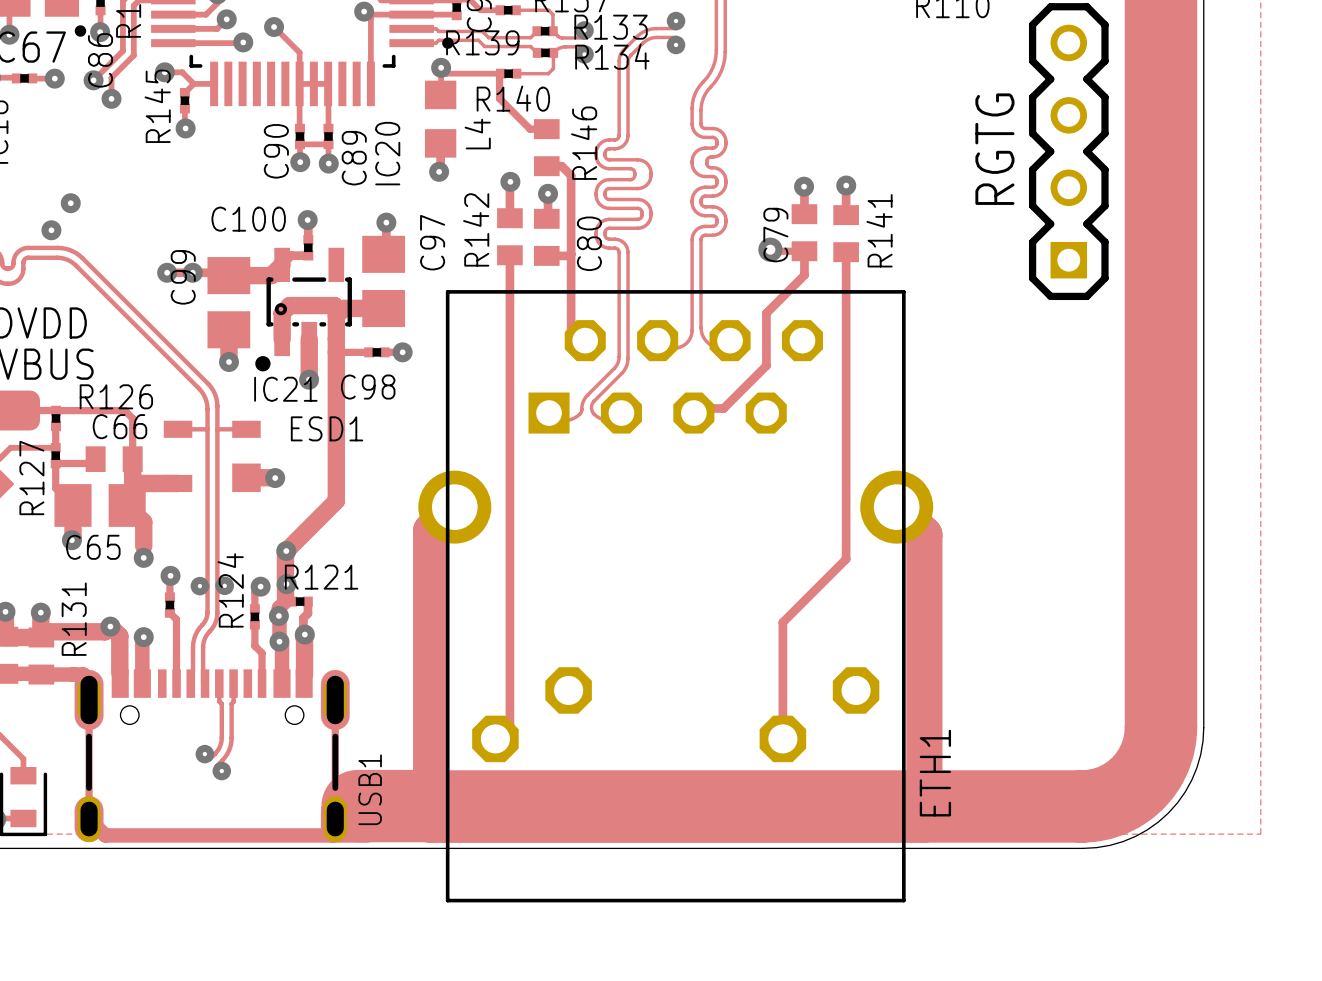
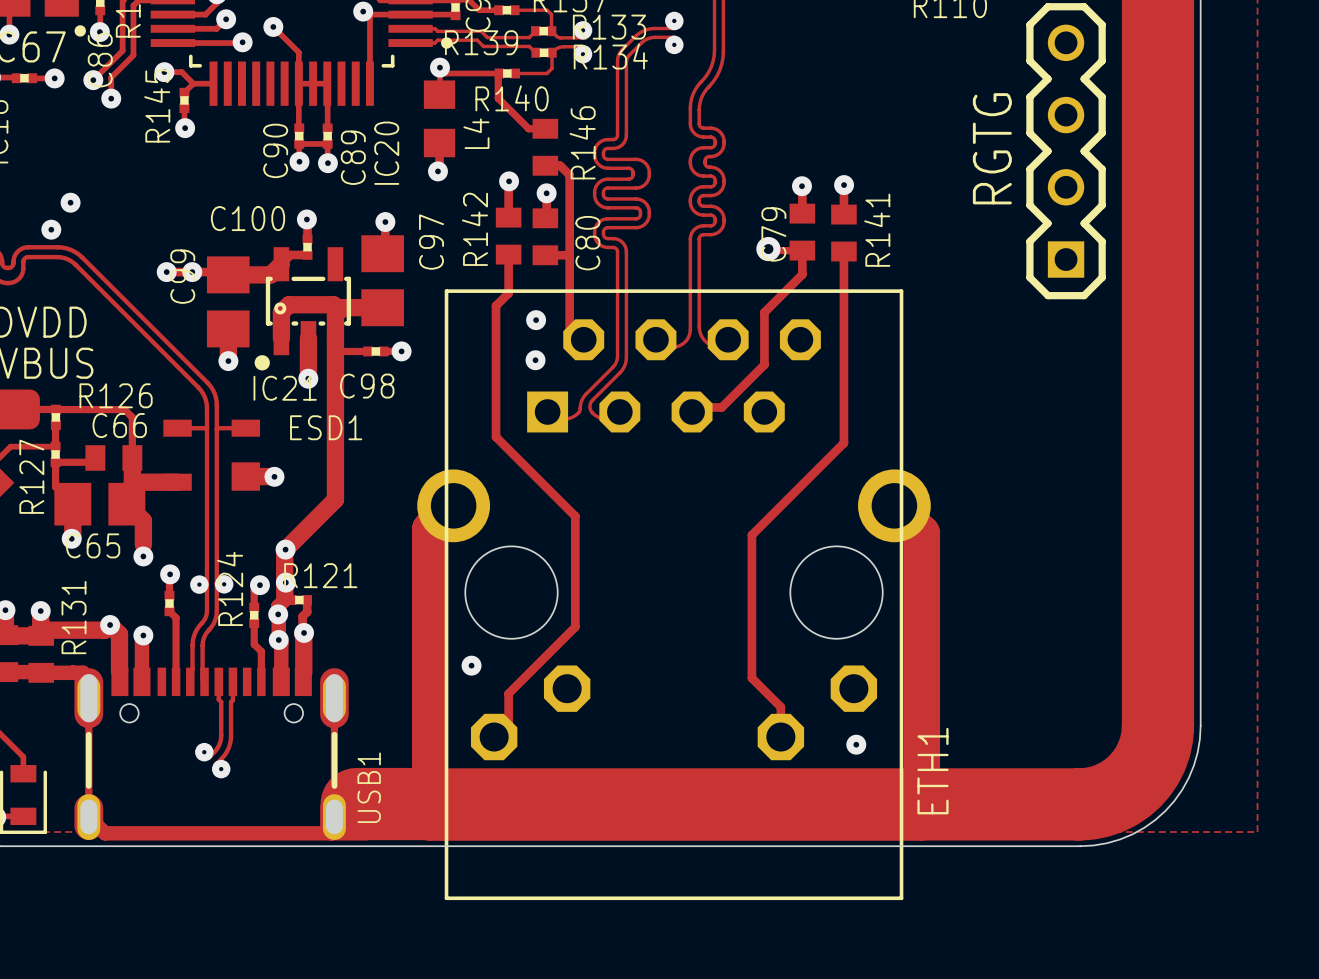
ETH1 footprint: [418, 290, 934, 903] -> [417, 289, 931, 901]
track: (509, 294) (509, 695) -> (508, 293) (496, 305) (496, 437) (575, 516) (575, 626) (508, 693)
via: none -> (536, 320)
via: none -> (535, 360)
track: (846, 444) (846, 559) (782, 622) (782, 708) -> (843, 443) (751, 535) (751, 678) (780, 707)
via: none -> (471, 665)
via: none -> (856, 744)

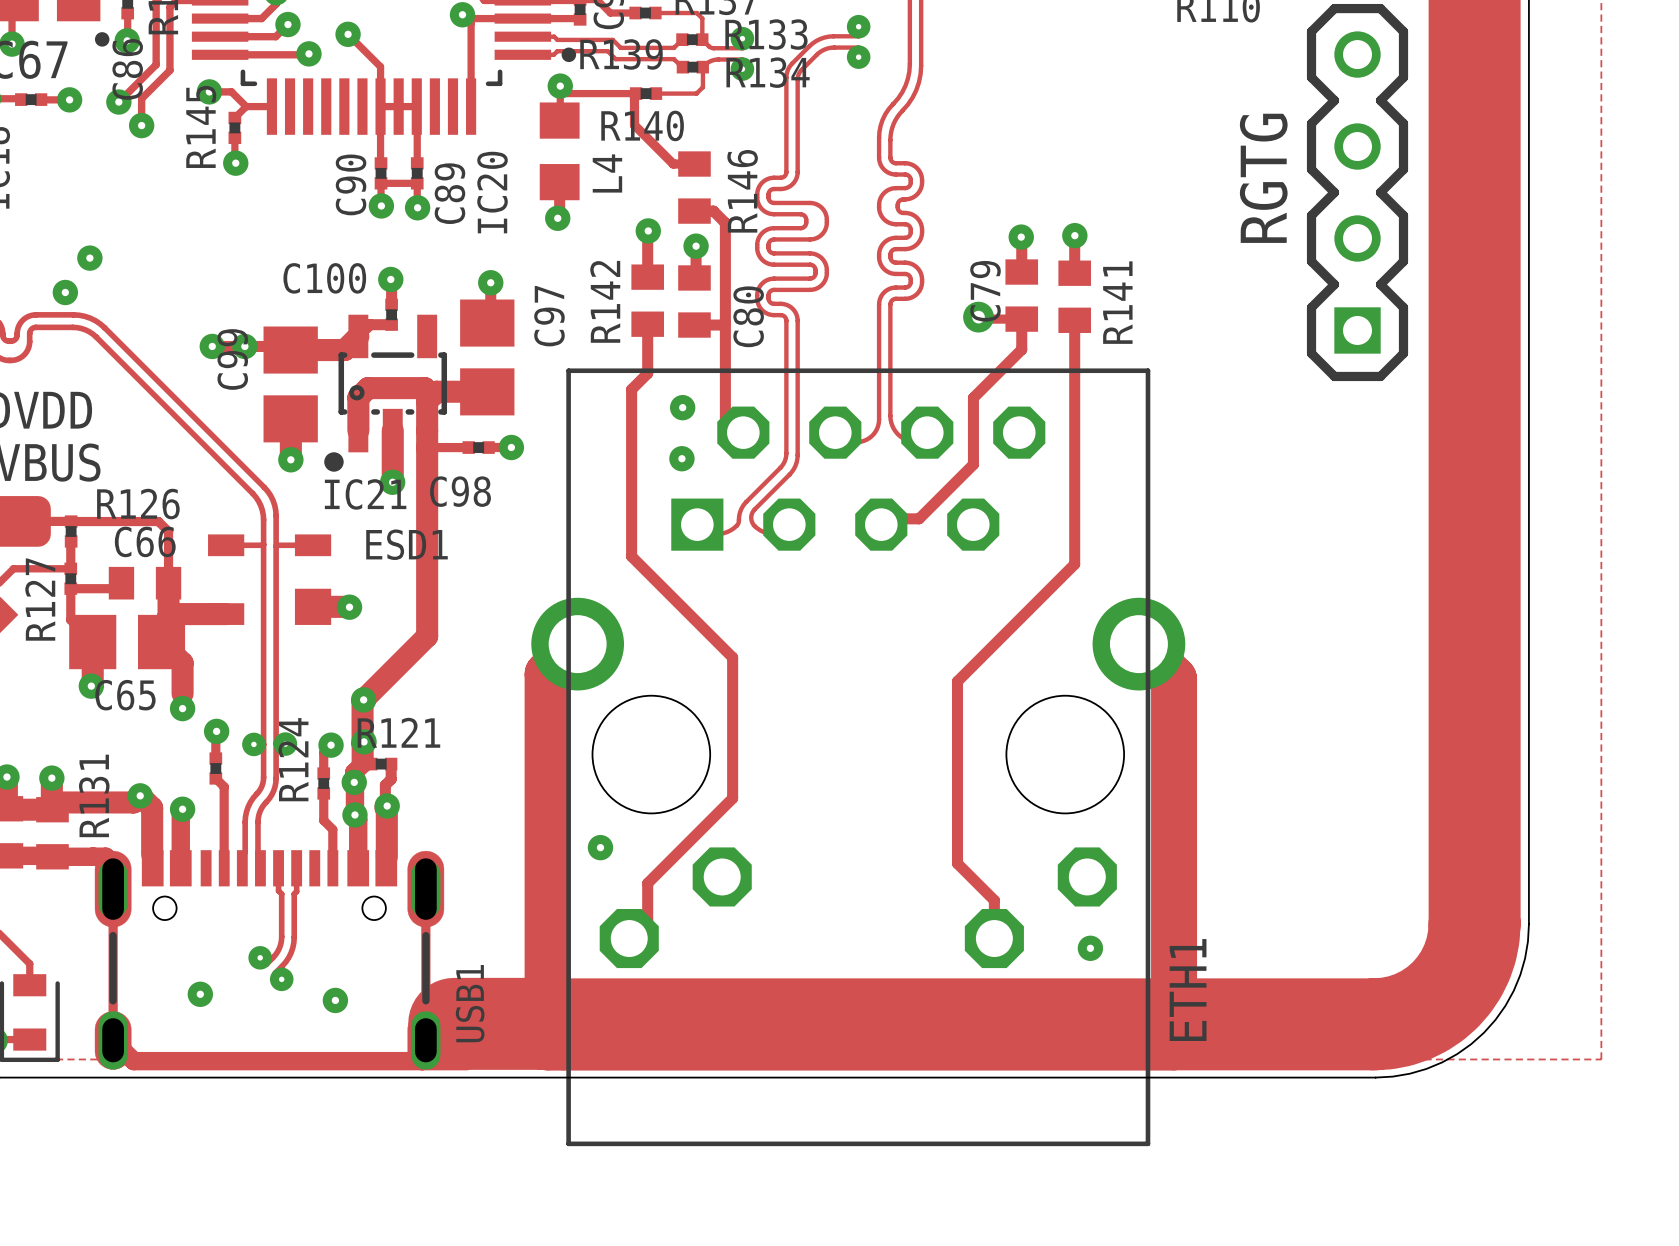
via: none -> (200, 994)
via: none -> (335, 1000)

